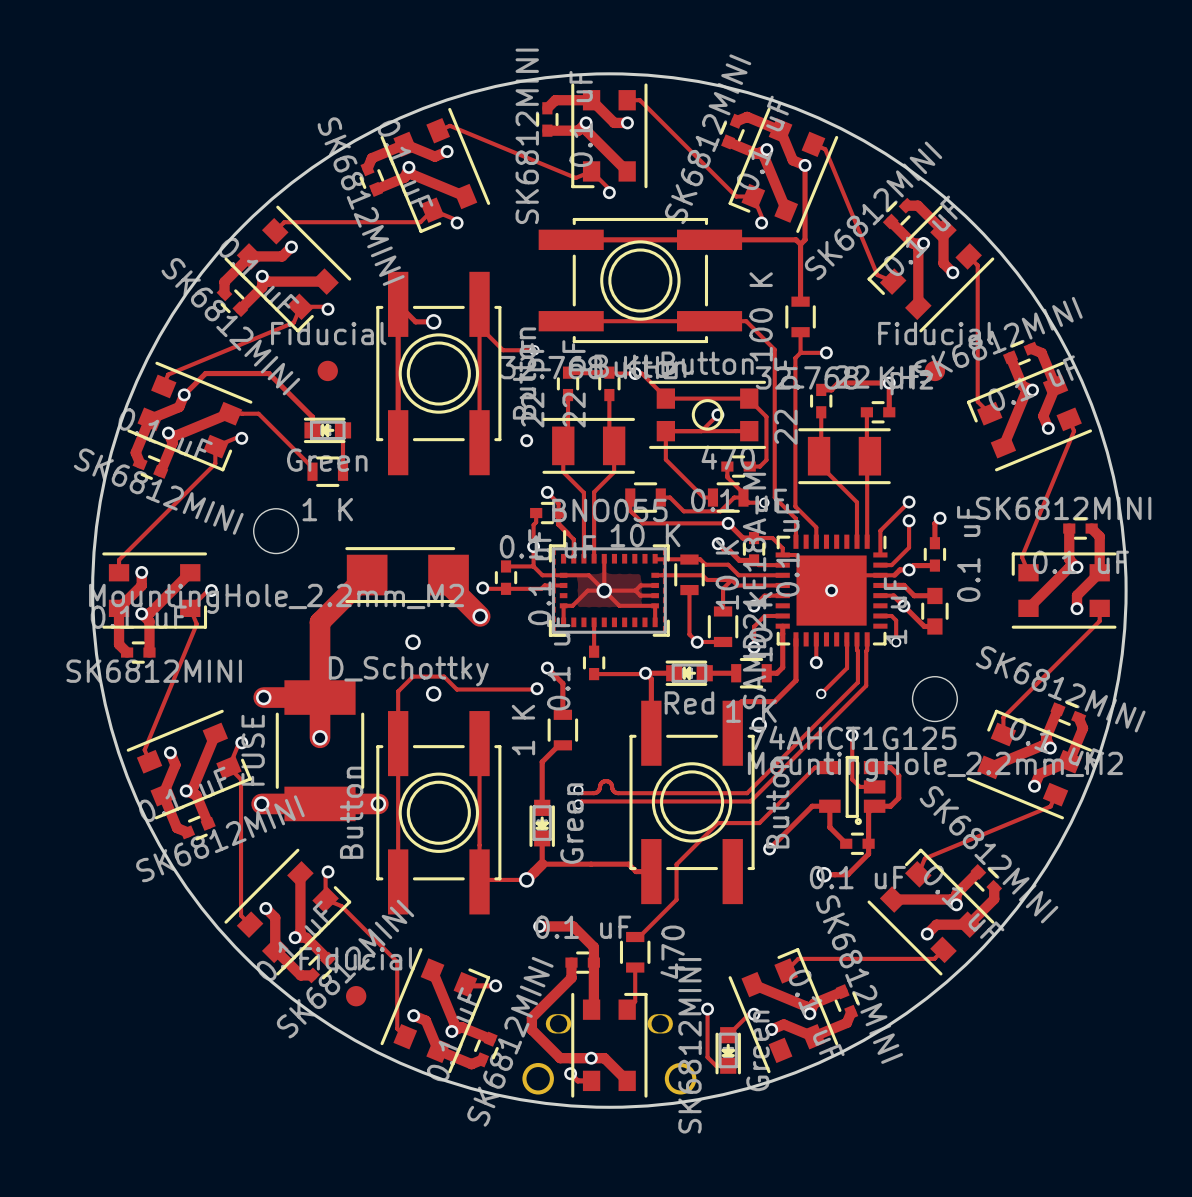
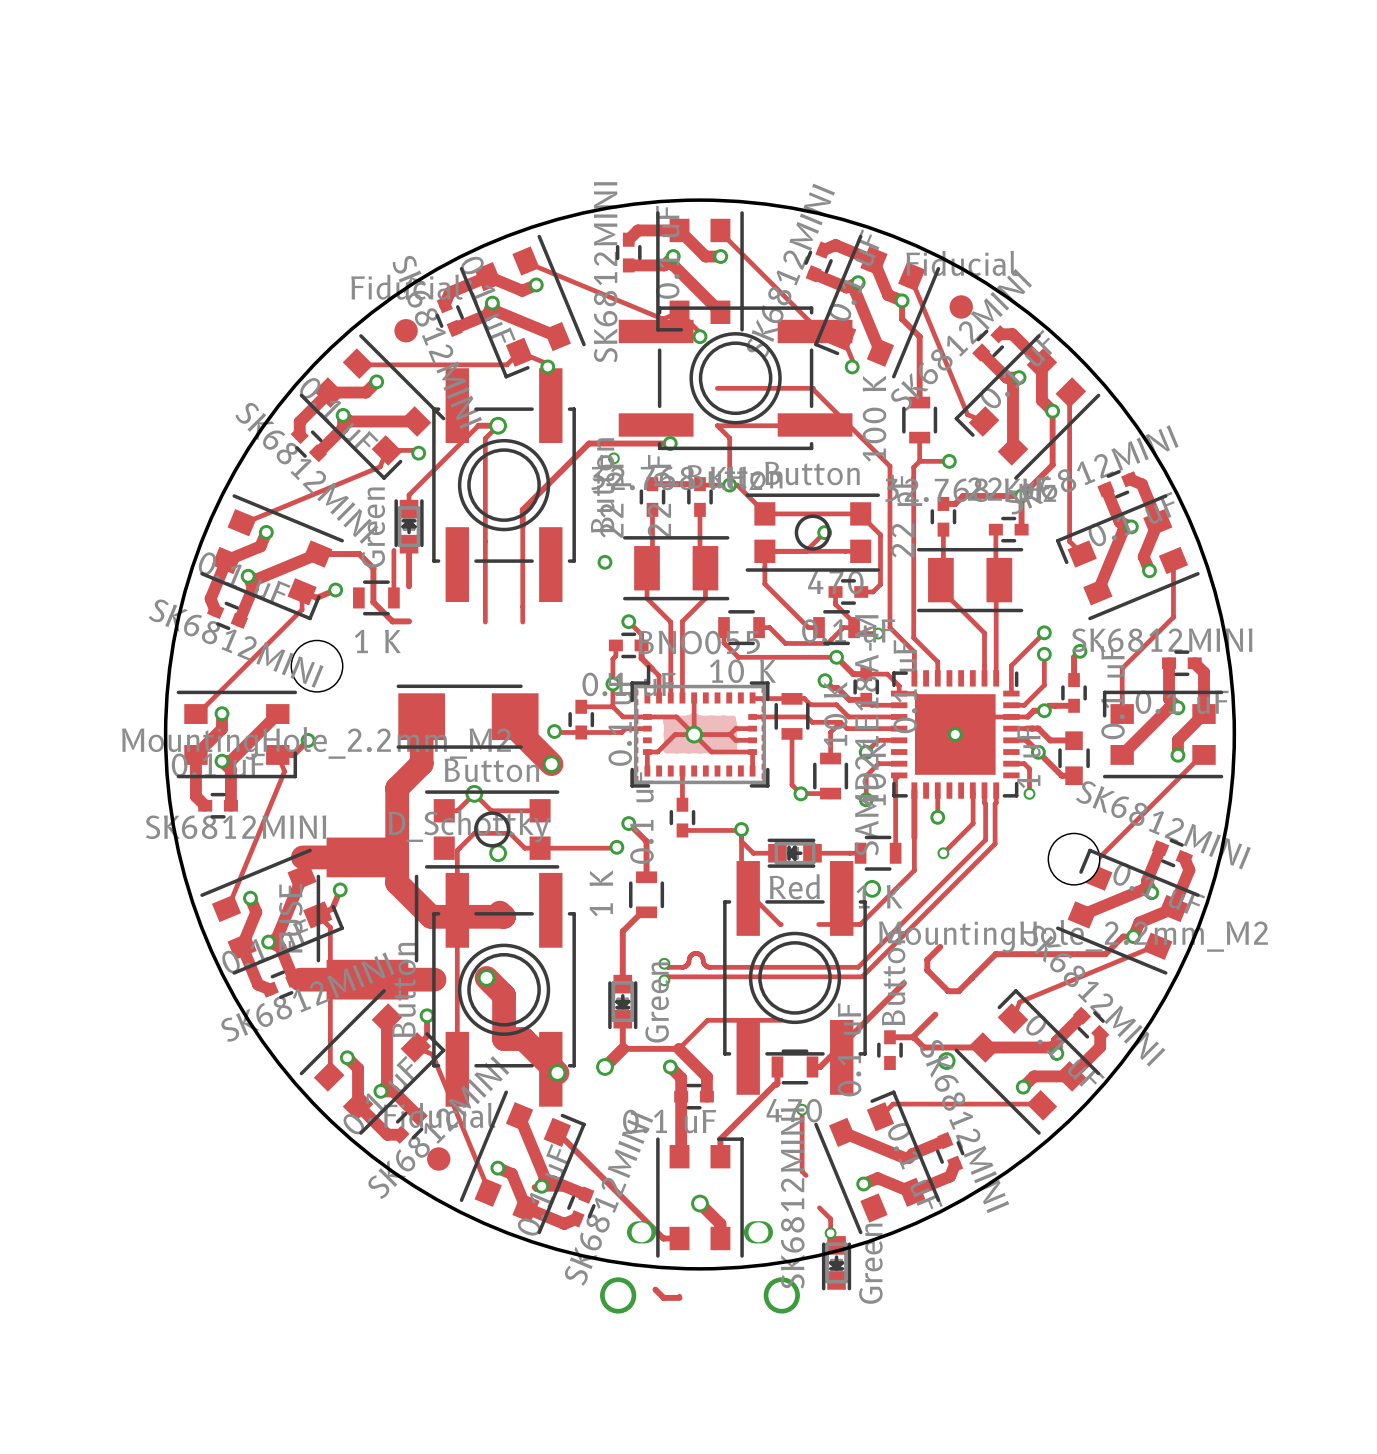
round board edge size: [91, 72, 1128, 1109] -> [163, 198, 1237, 1271]
track: (627, 101) (627, 100) (639, 100) (736, 196) (753, 196) (762, 219) (761, 222) -> none
track: (547, 108) (555, 100) (591, 100) (614, 122) (627, 122) -> (628, 239) (637, 230) (679, 230) (705, 256) (720, 256)
part position: (547, 119) -> (628, 252)
track: (736, 121) (747, 116) (780, 130) (792, 160) (805, 165) (805, 239) (800, 244) -> none
via: (586, 122) -> none
via: (627, 122) -> none
track: (547, 130) (578, 130) (586, 122) (586, 130) (627, 171) -> (628, 265) (664, 265) (673, 256) (673, 265) (720, 312)
part position: (732, 131) -> (818, 261)
track: (438, 132) (438, 130) (449, 125) (575, 177) (591, 171) (609, 189) (609, 192) -> none
part position: (609, 135) -> (699, 271)
track: (728, 141) (756, 153) (766, 149) (763, 156) (786, 210) -> (813, 273) (846, 287) (858, 282) (854, 290) (880, 352)
track: (812, 145) (813, 144) (825, 149) (877, 275) (893, 281) -> none
via: (766, 149) -> none
track: (447, 151) (434, 156) (405, 144) (371, 158) (367, 168) -> (536, 284) (522, 290) (488, 276) (449, 292) (444, 304)
via: (447, 151) -> none
track: none -> (720, 230) (824, 336) (842, 336) (853, 363) (852, 366)
via: (805, 165) -> none
via: (408, 167) -> none
part position: (435, 170) -> (522, 306)
part position: (783, 170) -> (877, 306)
via: none -> (673, 256)
via: none -> (720, 256)
track: none -> (525, 261) (663, 319) (679, 312) (699, 332) (699, 336)
part position: (371, 179) -> (449, 316)
track: (376, 189) (404, 177) (408, 167) (411, 174) (465, 196) -> (454, 328) (487, 314) (492, 303) (495, 311) (557, 336)
via: (609, 192) -> none
track: none -> (911, 276) (967, 414) (984, 421)
via: none -> (858, 282)
via: none -> (536, 284)
track: (906, 205) (917, 205) (943, 231) (943, 263) (952, 272) -> none
via: none -> (902, 300)
part position: (898, 213) -> (990, 343)
via: none -> (492, 303)
track: (890, 221) (912, 243) (923, 243) (918, 248) (918, 306) -> (981, 352) (1006, 377) (1019, 377) (1012, 383) (1012, 450)
track: (457, 222) (455, 219) (432, 210) (420, 222) (284, 222) (275, 231) (276, 232) -> none
via: (457, 222) -> none
via: (761, 222) -> none
track: (571, 239) (796, 239) -> (823, 250) (835, 245) (873, 261) (888, 295) (902, 300) (902, 319) (914, 331)
track: none -> (999, 334) (1012, 334) (1041, 363) (1041, 400) (1052, 411) (1052, 464) (1021, 496)
via: (923, 243) -> none
via: none -> (699, 336)
track: (291, 247) (282, 256) (250, 256) (224, 281) (224, 293) -> (376, 381) (365, 392) (329, 392) (299, 421) (299, 435)
via: (291, 247) -> none
track: (967, 257) (968, 256) (977, 265) (977, 401) (989, 413) -> none
track: none -> (358, 363) (506, 364) (519, 352) (546, 363) (547, 366)
part position: (287, 269) -> (372, 407)
part position: (930, 269) -> (1027, 407)
via: none -> (547, 366)
via: none -> (852, 366)
via: (952, 272) -> none
via: (262, 276) -> none
via: none -> (1019, 377)
track: (325, 281) (267, 281) (262, 276) (262, 287) (240, 309) -> (415, 421) (349, 421) (343, 415) (343, 428) (317, 453)
via: none -> (376, 381)
track: none -> (1070, 392) (1069, 541) (1082, 554)
part position: (232, 301) -> (308, 444)
track: (479, 304) (479, 442) -> none
track: (328, 309) (325, 306) (300, 306) (293, 322) (168, 374) (163, 386) (164, 387) -> none
via: (328, 309) -> none
via: none -> (1052, 411)
via: none -> (343, 415)
track: (416, 321) (398, 304) (398, 442) -> (478, 425) (409, 495) (409, 509)
track: none -> (498, 425) (485, 438) (485, 622)
track: (571, 321) (746, 321) (774, 349) (774, 357) -> (717, 388) (813, 388) (889, 466)
track: none -> (813, 425) (717, 425) (729, 438) (729, 485)
track: (479, 326) (503, 350) (534, 350) -> none
track: none -> (670, 443) (588, 443) (522, 509) (522, 622)
via: none -> (670, 443)
track: none -> (418, 453) (415, 450) (386, 450) (380, 466) (243, 523)
via: none -> (418, 453)
track: (1031, 348) (1041, 353) (1055, 386) (1043, 416) (1048, 428) -> (1129, 479) (1141, 484) (1157, 522) (1143, 556) (1149, 570)
part position: (1020, 352) -> (1117, 484)
track: (1010, 357) (1022, 385) (1032, 390) (1025, 392) (1003, 446) -> (1106, 489) (1119, 522) (1131, 526) (1123, 530) (1097, 592)
part position: (327, 370) -> (406, 330)
part position: (934, 370) -> (961, 306)
via: (1032, 390) -> none
via: (184, 394) -> none
via: none -> (1131, 526)
track: (228, 413) (175, 435) (168, 433) (172, 443) (160, 471) -> none
track: (229, 413) (258, 413) (312, 467) (312, 471) -> none
track: none -> (266, 532) (260, 546) (226, 560) (210, 598) (215, 610)
via: none -> (266, 532)
part position: (189, 416) -> (272, 557)
part position: (1029, 416) -> (1127, 557)
track: (1067, 419) (1069, 419) (1074, 431) (1021, 556) (1028, 572) -> none
track: none -> (409, 544) (409, 586)
via: (1048, 428) -> none
track: (312, 430) (312, 417) (268, 373) (205, 373) (184, 394) (179, 407) (149, 419) (135, 452) (140, 463) -> none
part rotation: 0° (327, 430) -> 90° clockwise (409, 526)
part position: (327, 430) -> (409, 526)
via: (168, 433) -> none
track: (241, 438) (238, 436) (215, 446) (215, 463) (119, 559) (119, 572) (120, 572) -> none
via: (241, 438) -> none
track: none -> (1173, 560) (1173, 617) (1122, 668) (1122, 714)
via: none -> (1149, 570)
via: none -> (248, 576)
track: none -> (335, 590) (316, 597) (302, 591) (302, 609) (197, 714)
via: none -> (335, 590)
part position: (150, 467) -> (227, 615)
track: none -> (239, 620) (253, 587) (248, 576) (256, 579) (317, 554) (359, 554) (373, 568) (373, 602) (392, 621) (409, 621)
track: (1069, 528) (1069, 559) (1077, 567) (1069, 567) (1028, 608) -> (1169, 663) (1169, 698) (1177, 707) (1169, 707) (1121, 755)
part position: (1080, 528) -> (1181, 663)
track: (1091, 528) (1099, 536) (1099, 572) (1077, 595) (1077, 608) -> (1194, 663) (1204, 672) (1204, 714) (1177, 740) (1177, 755)
via: none -> (1177, 707)
via: (1077, 567) -> none
track: (141, 572) (141, 585) (119, 608) (119, 644) (127, 652) -> (222, 713) (222, 728) (195, 754) (195, 796) (205, 805)
via: (141, 572) -> none
track: (190, 572) (149, 613) (141, 613) (149, 621) (149, 652) -> (277, 714) (230, 761) (222, 761) (230, 770) (230, 805)
via: none -> (222, 713)
track: (367, 575) (320, 622) (320, 737) -> (421, 716) (421, 763) (397, 788) (397, 882) (431, 916) (504, 916) (499, 912)
part position: (154, 590) -> (236, 734)
track: (211, 590) (208, 590) (190, 608) (196, 624) (144, 749) (149, 761) (150, 761) -> none
via: (211, 590) -> none
part position: (1064, 590) -> (1163, 734)
track: none -> (308, 740) (293, 754) (277, 754) (284, 771) (228, 907)
via: none -> (308, 740)
via: none -> (1177, 755)
track: none -> (1204, 754) (1097, 859) (1097, 877)
via: (1077, 608) -> none
track: (1098, 608) (1099, 608) (1099, 621) (1003, 717) (1003, 734) -> none
via: (141, 613) -> none
via: none -> (222, 761)
track: (782, 626) (782, 667) (776, 673) (766, 673) -> (899, 775) (895, 778) (895, 853)
part position: (138, 652) -> (218, 805)
track: none -> (444, 810) (457, 810) (474, 793) (491, 810) (540, 810)
part: none -> Button (492, 829)
track: none -> (741, 829) (741, 885) (781, 924)
track: (674, 673) (645, 673) (651, 679) (651, 733) -> none
part position: (689, 673) -> (794, 853)
track: (704, 673) (736, 673) -> none
part position: (751, 673) -> (878, 853)
track: (795, 680) (774, 701) (741, 701) (732, 710) (732, 733) -> (914, 837) (914, 870) (860, 924) (818, 924)
track: none -> (741, 841) (753, 853) (777, 853)
track: none -> (812, 853) (860, 853)
via: (263, 697) -> none
track: none -> (1184, 858) (1189, 870) (1173, 908) (1139, 922) (1133, 936) (1123, 936) (1105, 954) (995, 954) (958, 991) (948, 991) (927, 970) (927, 959) (940, 946)
track: (1057, 709) (1046, 737) (1050, 748) (1043, 745) (989, 767) -> (1160, 848) (1146, 881) (1151, 892) (1143, 889) (1082, 914)
part position: (1068, 713) -> (1172, 853)
track: (1078, 717) (1083, 728) (1069, 761) (1039, 774) (1034, 786) -> none
track: none -> (340, 889) (332, 908) (317, 914) (330, 927) (330, 1075)
via: none -> (340, 889)
via: none -> (1151, 892)
via: none -> (250, 898)
track: (215, 734) (193, 788) (186, 791) (196, 795) (208, 823) -> (302, 877) (276, 938) (268, 942) (280, 946) (293, 979)
track: (852, 735) (852, 779) (859, 786) (874, 786) -> none
via: (852, 735) -> none
via: (320, 737) -> none
track: (241, 742) (238, 744) (228, 767) (241, 779) (241, 915) (250, 924) (251, 923) -> none
via: (241, 742) -> none
track: (479, 743) (479, 881) (481, 879) (526, 879) -> none
via: (1050, 748) -> none
track: (170, 752) (175, 765) (163, 794) (177, 828) (187, 832) -> (250, 898) (256, 912) (242, 946) (258, 984) (270, 989)
via: (170, 752) -> none
part position: (189, 764) -> (272, 911)
part position: (1029, 764) -> (1127, 911)
via: none -> (1133, 936)
track: (829, 767) (814, 767) (759, 823) (717, 823) (676, 864) (676, 899) (639, 937) (635, 937) -> none
track: (874, 767) (890, 767) (898, 775) (898, 798) (890, 806) (874, 806) (868, 812) (868, 854) (847, 874) (824, 874) -> none
via: none -> (268, 942)
track: none -> (1156, 945) (1019, 1002) (1012, 1018)
via: (1034, 786) -> none
part: 74AHCT1G125 (852, 790) -> none
via: (186, 791) -> none
track: (1054, 794) (1055, 794) (1050, 806) (924, 858) (918, 874) -> none
track: none -> (486, 977) (504, 995) (504, 1039) (523, 1039) (557, 1072)
via: (261, 803) -> none
via position: (378, 803) -> (486, 977)
track: none -> (903, 983) (820, 1066) (812, 1066)
part position: (197, 828) -> (282, 984)
track: none -> (935, 1014) (912, 1037)
track: none -> (427, 1015) (427, 1036) (415, 1047) (432, 1054) (488, 1190)
via: none -> (427, 1015)
track: none -> (781, 1020) (707, 1020) (678, 1048) (706, 1076) (706, 1096)
track: (846, 843) (829, 827) (829, 806) (812, 806) (769, 848) -> none
part rotation: 0° (857, 843) -> 90° clockwise (889, 1050)
part position: (857, 843) -> (889, 1050)
via: (769, 848) -> none
track: none -> (889, 1037) (913, 1037) (923, 1047) (984, 1047)
track: (591, 864) (628, 864) (636, 871) (651, 871) -> none
via: none -> (1056, 1053)
via: none -> (347, 1057)
track: (328, 871) (325, 874) (325, 899) (341, 906) (397, 961) (397, 1028) (405, 1036) -> none
via: (328, 871) -> none
track: (978, 871) (956, 893) (956, 904) (951, 899) (893, 899) -> (1082, 1015) (1056, 1040) (1056, 1053) (1050, 1047) (983, 1047)
track: (300, 874) (300, 932) (295, 937) (306, 937) (328, 959) -> (386, 1018) (386, 1085) (380, 1091) (393, 1091) (418, 1116)
track: none -> (670, 1066) (681, 1077) (681, 1155)
via: none -> (670, 1066)
track: none -> (777, 1066) (777, 1083) (720, 1139) (720, 1156)
part position: (986, 879) -> (1091, 1024)
via: none -> (557, 1072)
track: (994, 887) (994, 899) (968, 924) (936, 924) (927, 934) -> (1100, 1033) (1100, 1047) (1070, 1076) (1033, 1076) (1023, 1087)
via: none -> (1023, 1087)
via: none -> (380, 1091)
via: (956, 904) -> none
track: (265, 908) (275, 917) (275, 949) (300, 975) (312, 975) -> (347, 1057) (358, 1068) (358, 1105) (387, 1134) (400, 1134)
via: (265, 908) -> none
part position: (287, 912) -> (372, 1061)
track: none -> (1040, 1104) (893, 1104) (880, 1116)
part position: (930, 912) -> (1027, 1061)
track: none -> (802, 1109) (802, 1171) (806, 1175)
via: none -> (802, 1109)
track: (539, 926) (573, 926) (593, 947) (593, 1007) (591, 1009) -> none
via: (539, 926) -> none
via: (927, 934) -> none
track: none -> (557, 1132) (663, 1238) (679, 1238)
track: none -> (842, 1132) (904, 1157) (908, 1157) (912, 1154) (945, 1140)
via: (295, 937) -> none
track: (942, 948) (943, 949) (934, 958) (798, 958) (786, 970) -> none
part rotation: 0° (635, 952) -> 90° clockwise (794, 1066)
part position: (635, 952) -> (794, 1066)
track: (571, 962) (571, 978) (531, 1017) (531, 1029) (560, 1058) (604, 1058) (627, 1080) -> none
part position: (582, 962) -> (694, 1096)
part position: (320, 967) -> (409, 1125)
via: none -> (497, 1168)
track: (635, 967) (635, 1001) (627, 1009) -> none
track: (432, 970) (454, 1024) (451, 1031) (462, 1027) (490, 1039) -> (519, 1116) (545, 1178) (541, 1186) (553, 1181) (586, 1195)
via: none -> (863, 1184)
track: (753, 984) (806, 1006) (809, 1013) (814, 1003) (842, 991) -> none
via position: (495, 985) -> (541, 1186)
part position: (356, 996) -> (438, 1159)
track: none -> (699, 1203) (720, 1223) (720, 1238)
via: none -> (699, 1203)
track: none -> (819, 1207) (830, 1218) (830, 1233)
part position: (846, 1002) -> (950, 1152)
track: (707, 1009) (707, 1057) (715, 1065) (728, 1065) -> none
via: (707, 1009) -> none
part position: (435, 1010) -> (522, 1162)
part position: (783, 1010) -> (877, 1162)
track: (851, 1012) (846, 1022) (813, 1036) (783, 1024) (771, 1029) -> (955, 1164) (950, 1176) (911, 1192) (877, 1178) (863, 1184)
via: (809, 1013) -> none
track: (754, 1014) (749, 1014) (728, 1035) -> none
via: (754, 1014) -> none
track: (413, 1015) (425, 1020) (438, 1050) (471, 1064) (482, 1059) -> (497, 1168) (511, 1173) (525, 1207) (564, 1223) (576, 1218)
via: (413, 1015) -> none
via: none -> (830, 1233)
via: (771, 1029) -> none
via: (451, 1031) -> none
part position: (609, 1045) -> (699, 1197)
part position: (486, 1049) -> (581, 1206)
via: (591, 1058) -> none
via: (570, 1073) -> none

